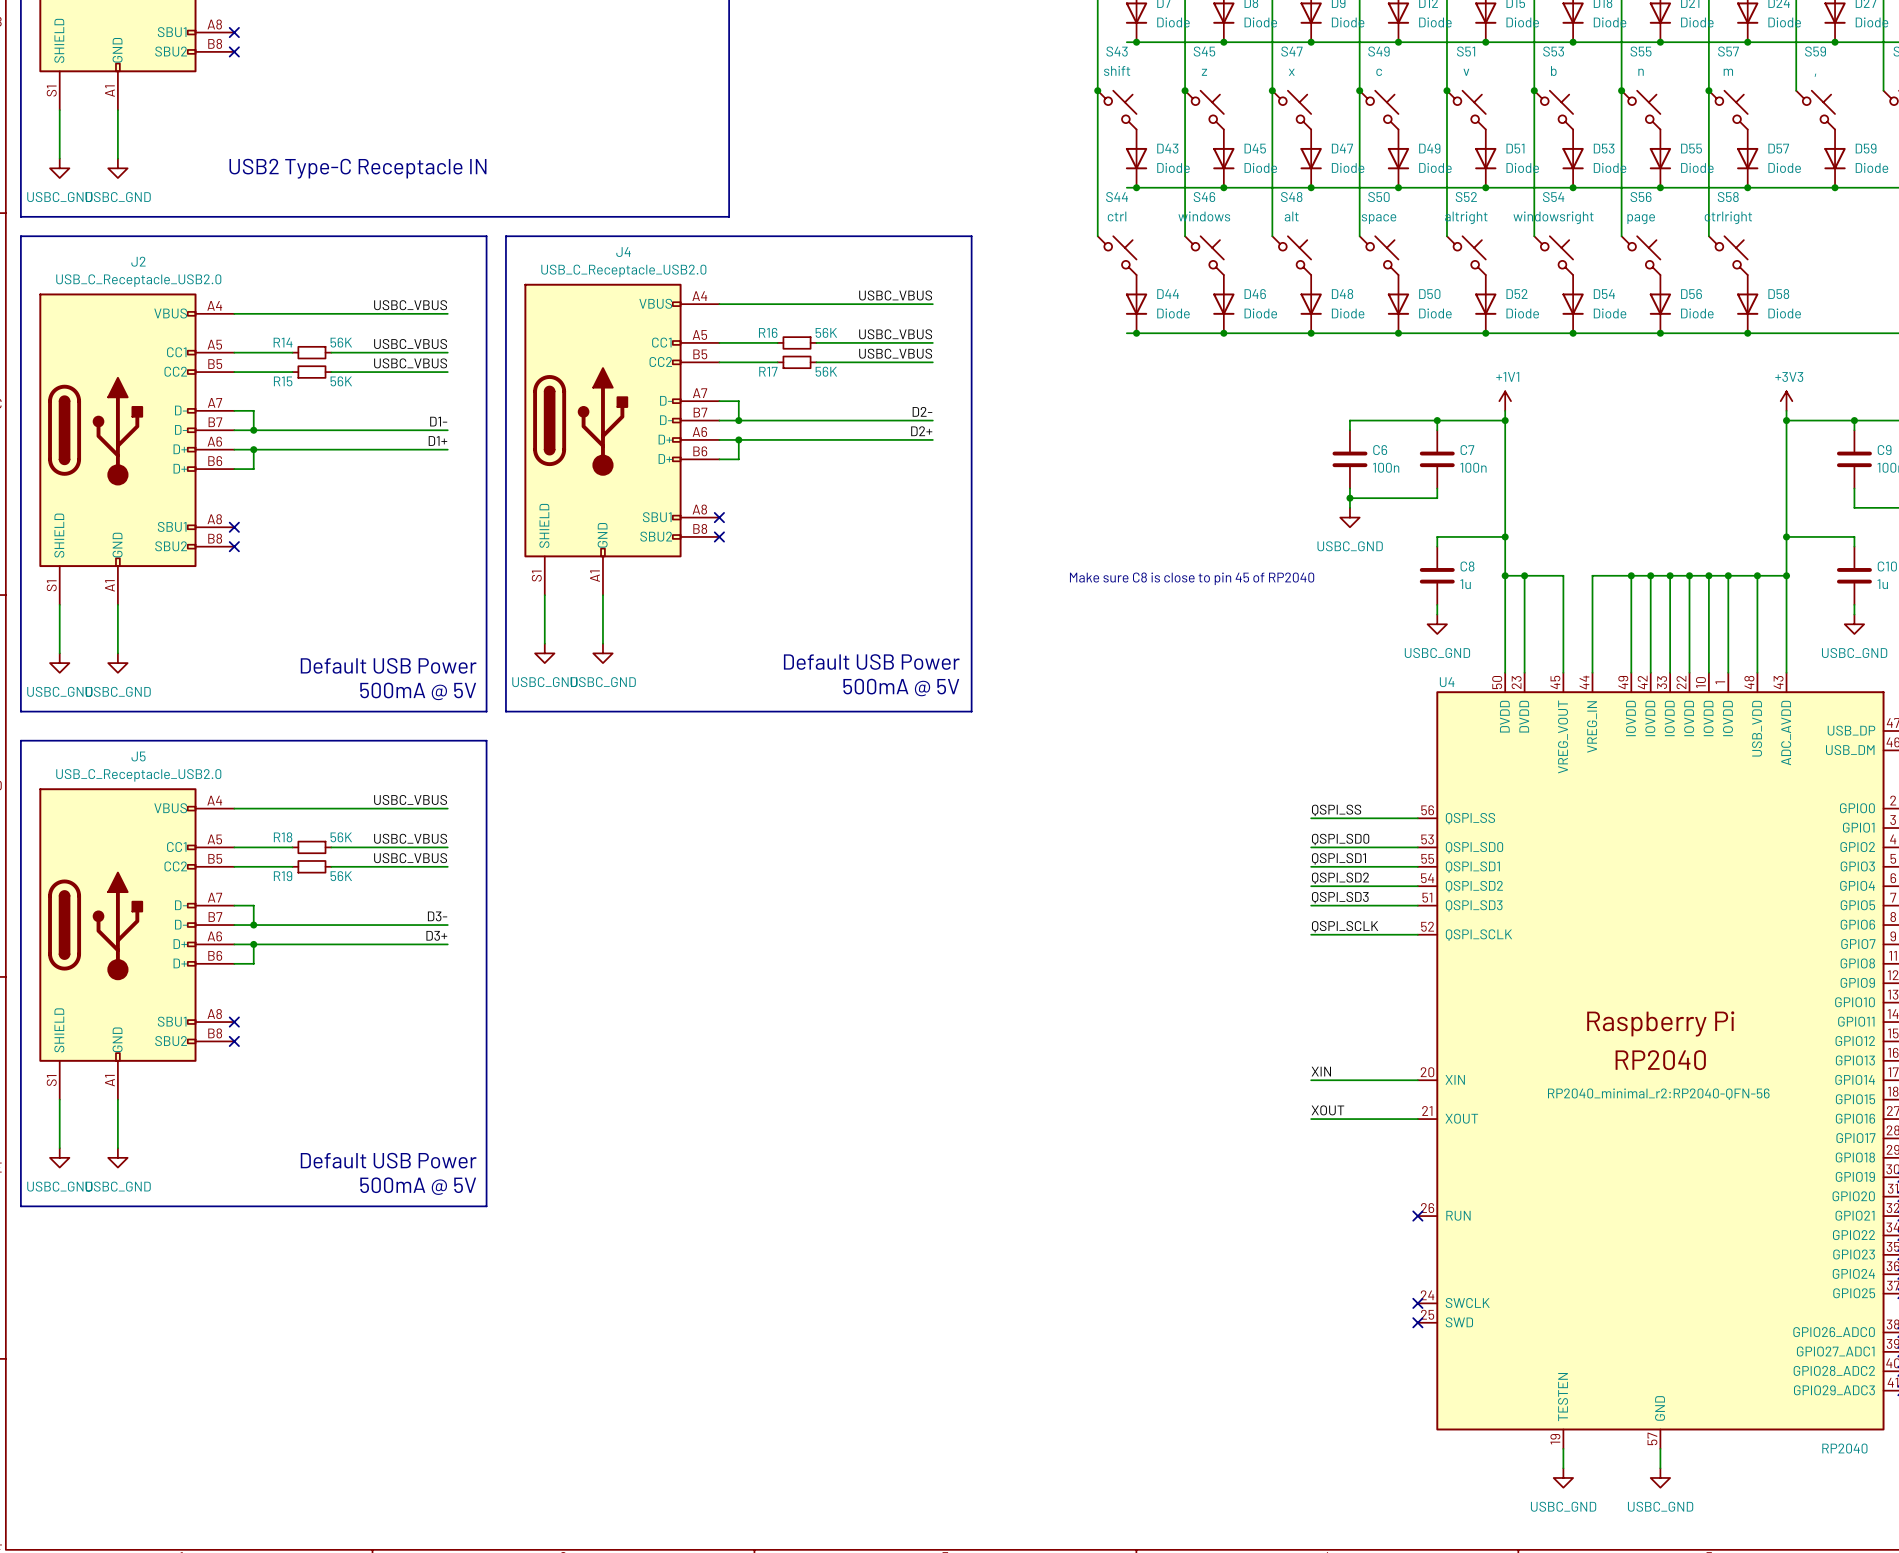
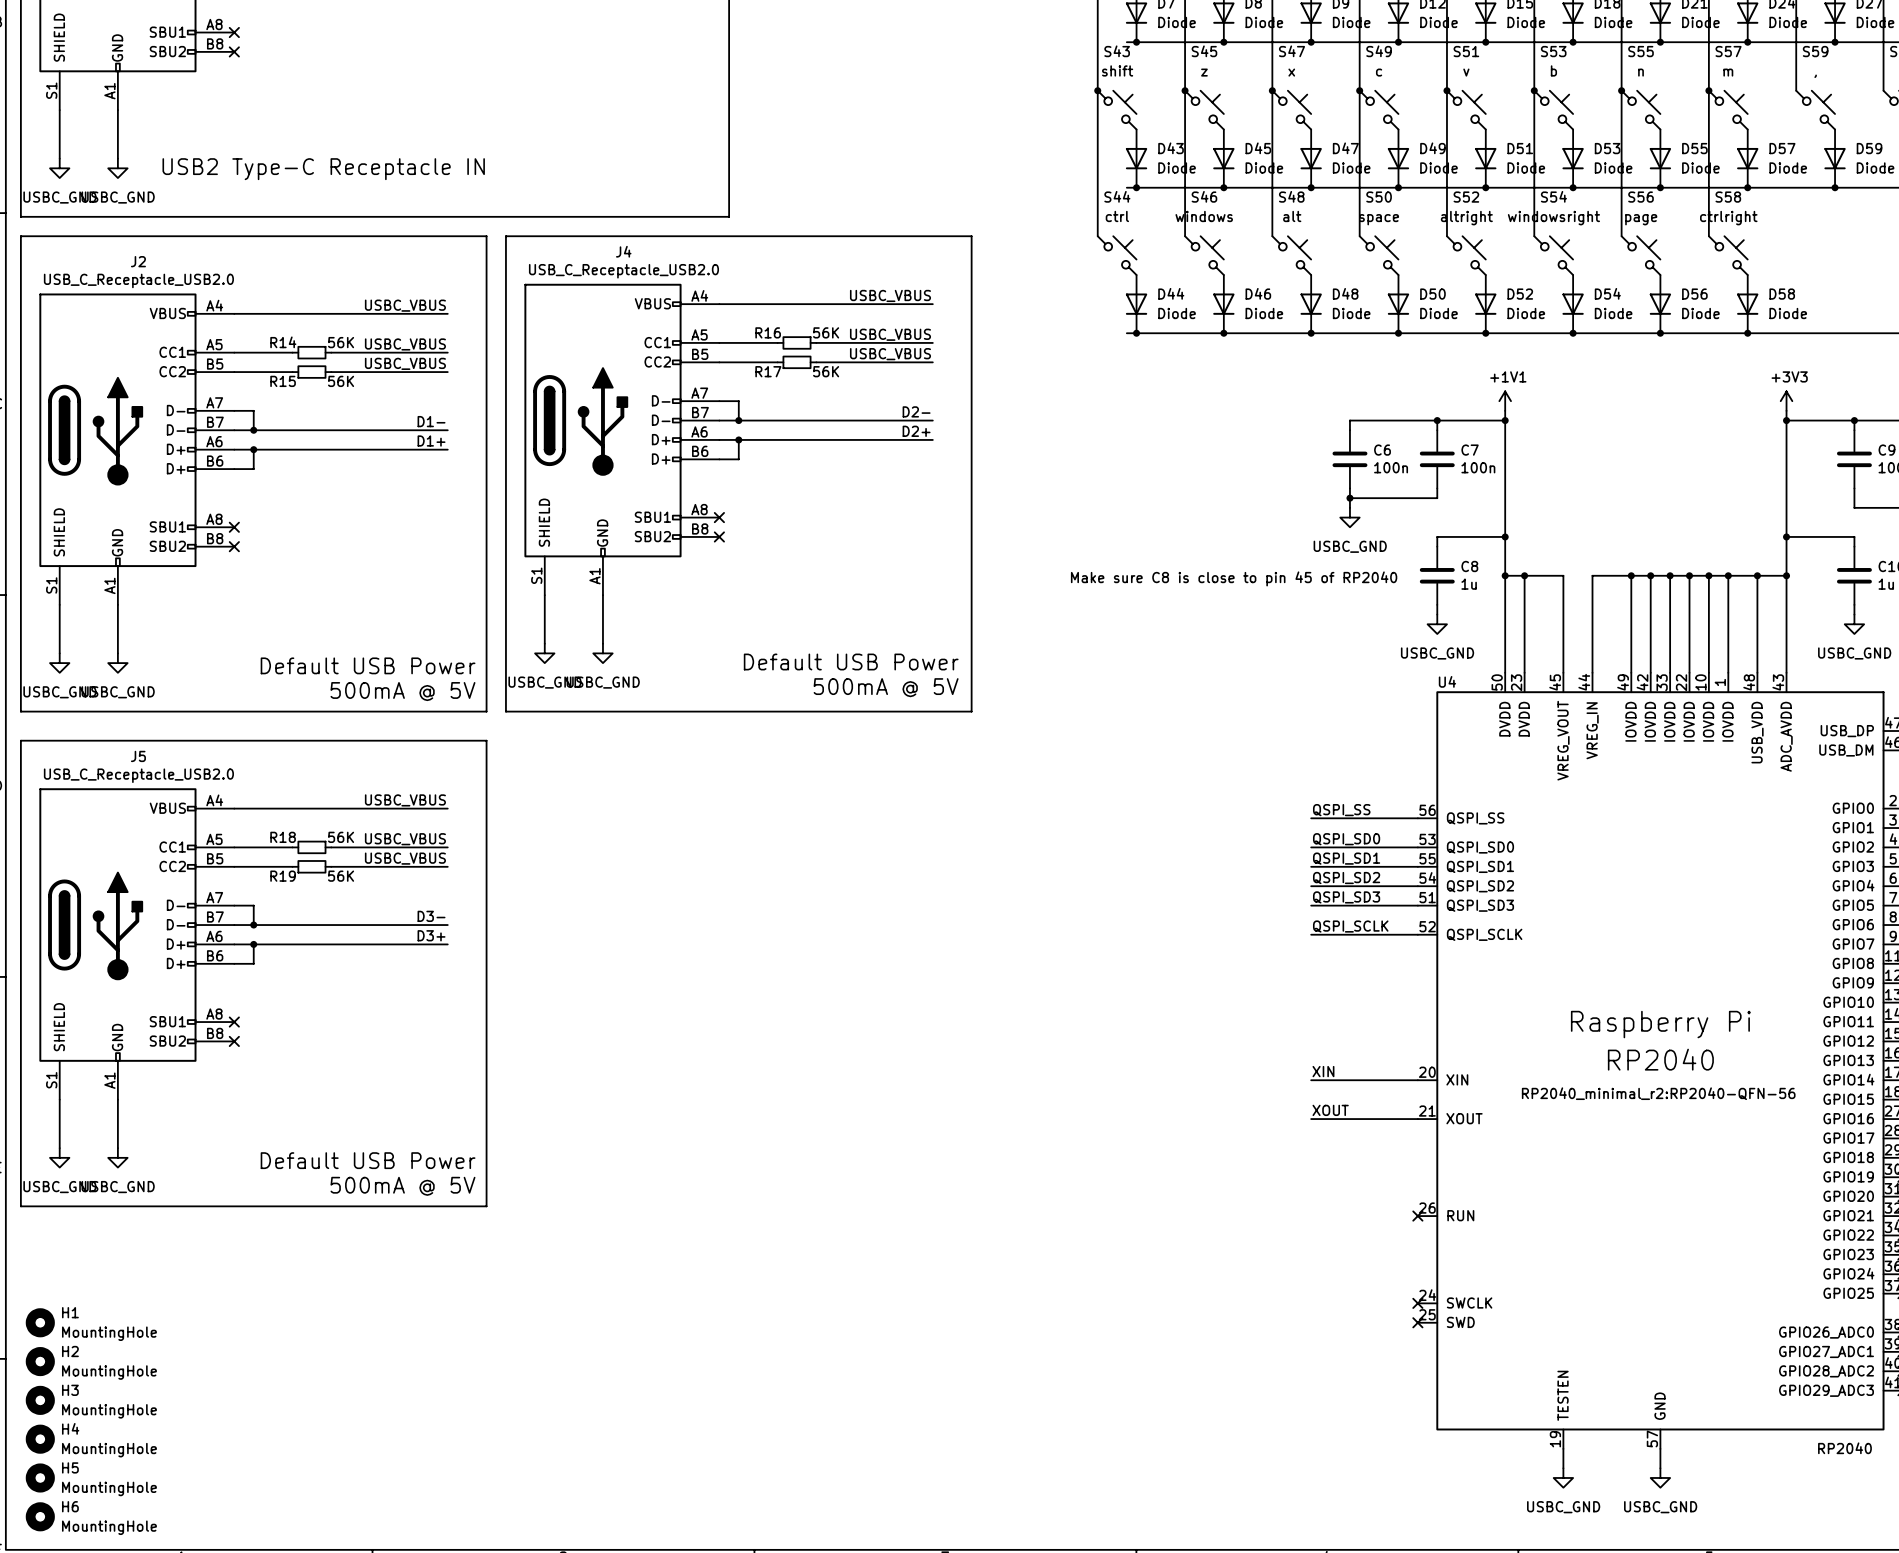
H1: none -> MountingHole (40, 1322)
H2: none -> MountingHole (40, 1361)
H3: none -> MountingHole (40, 1400)
H4: none -> MountingHole (40, 1439)
H5: none -> MountingHole (40, 1477)
H6: none -> MountingHole (40, 1516)

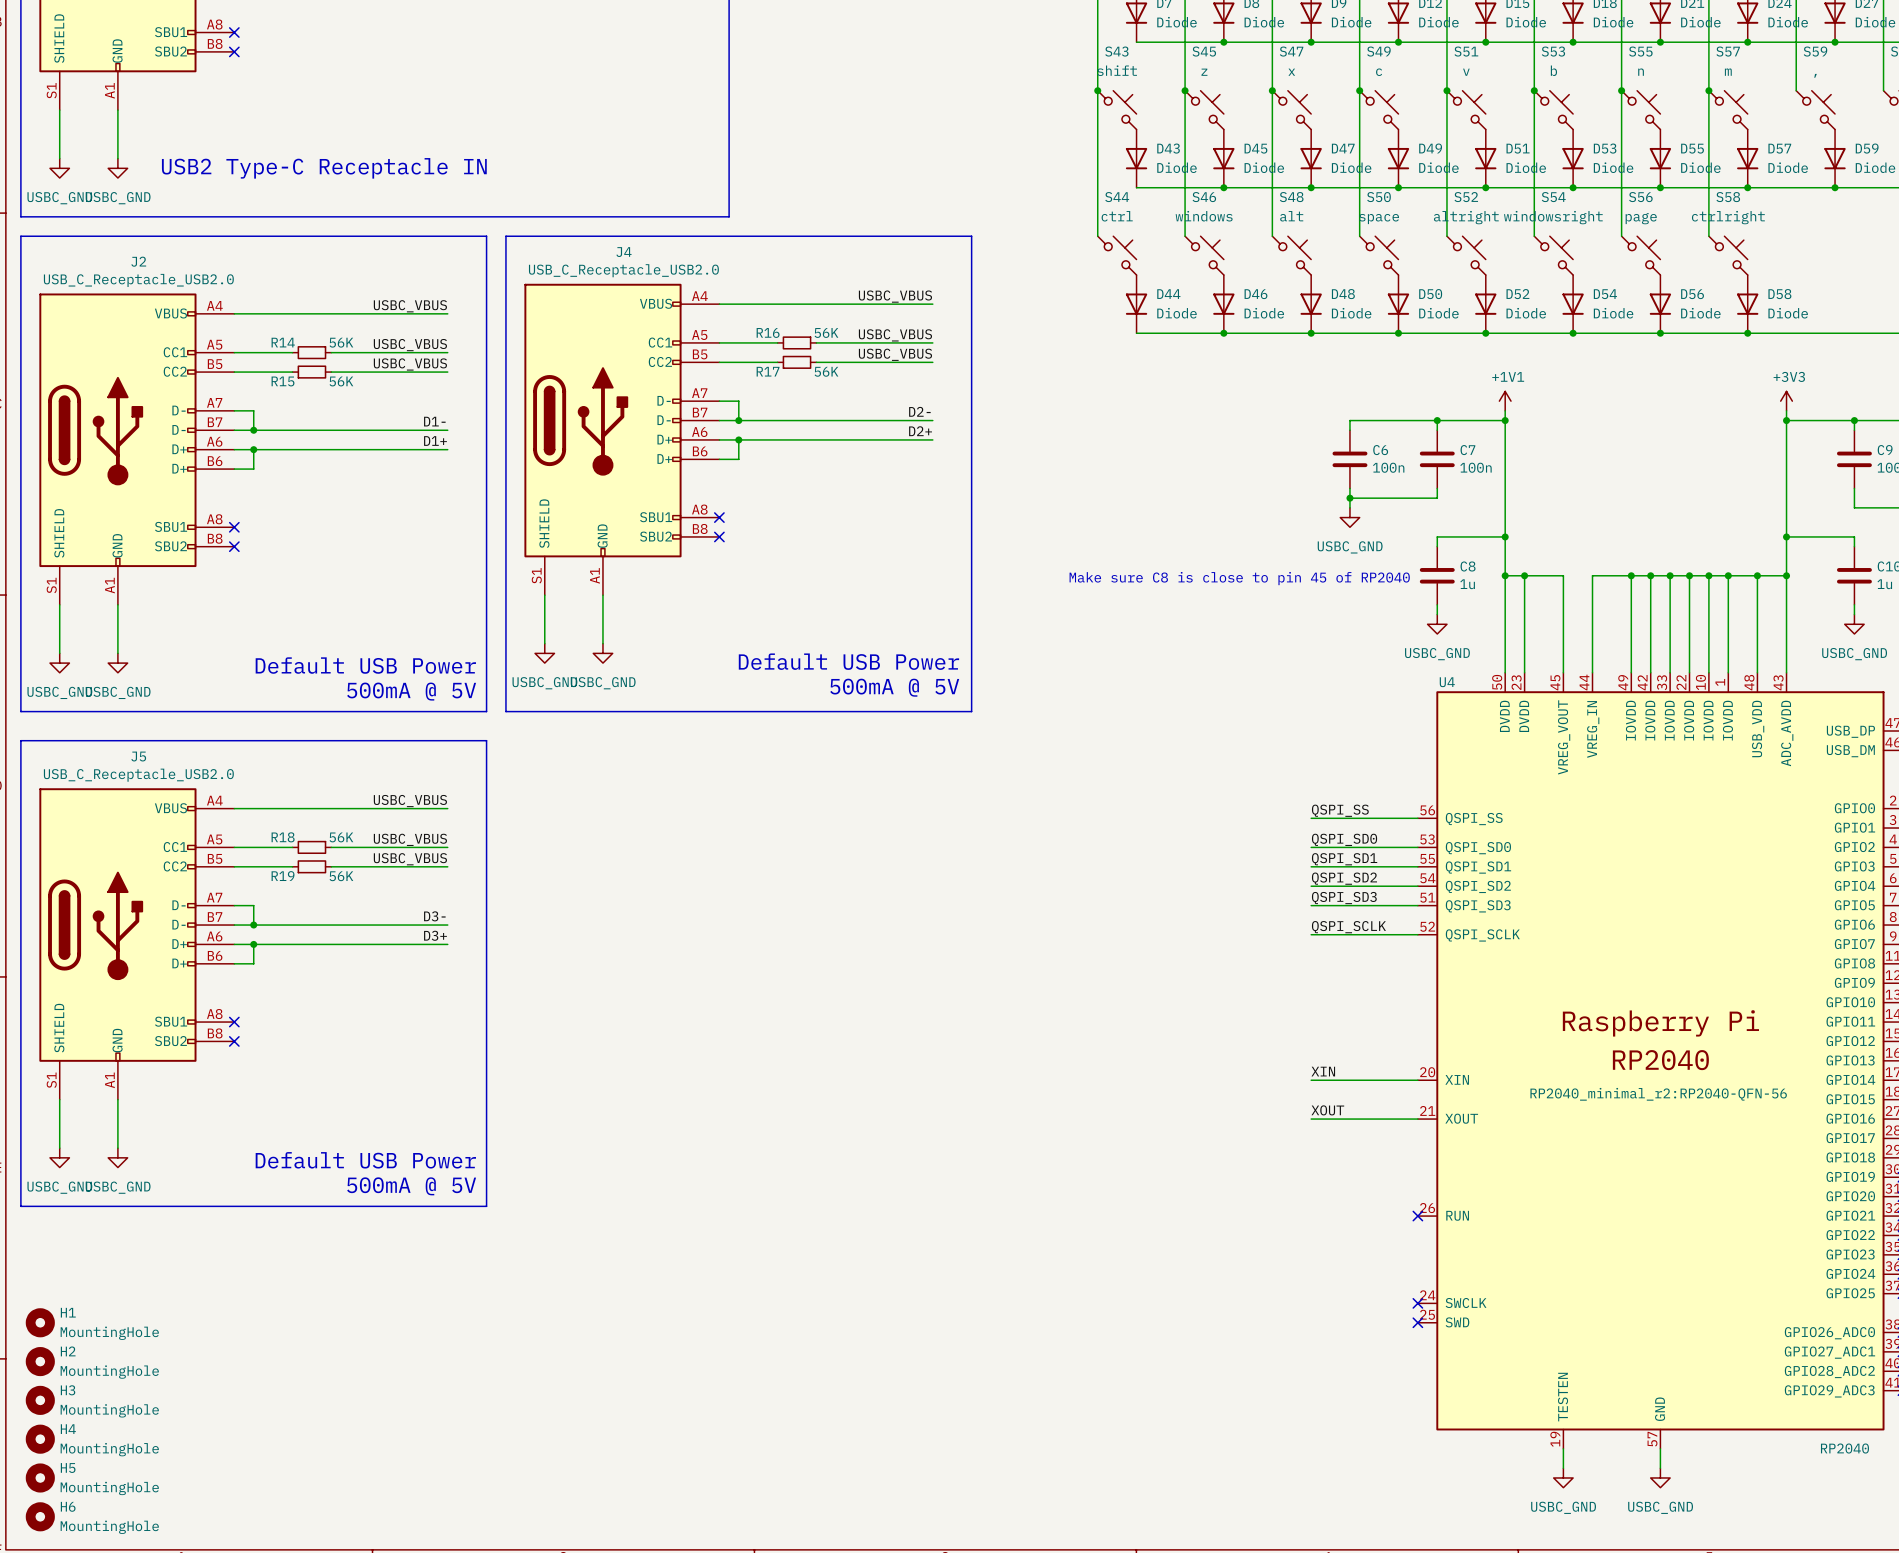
wire: (1126, 42) (1136, 42) -> none
junction: (1136, 42) -> none
wire: (1126, 187) (1136, 187) -> none
junction: (1136, 187) -> none
wire: (1126, 333) (1136, 333) -> none
junction: (1136, 333) -> none

